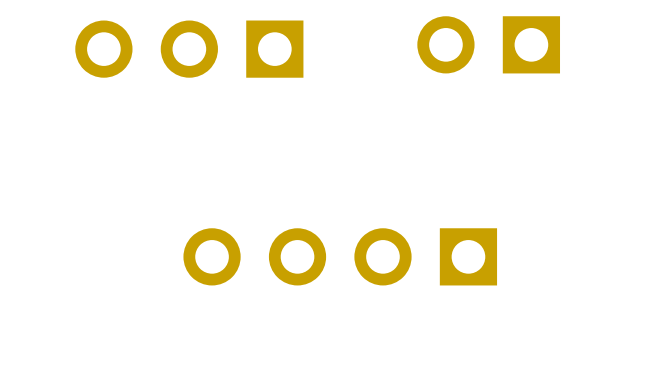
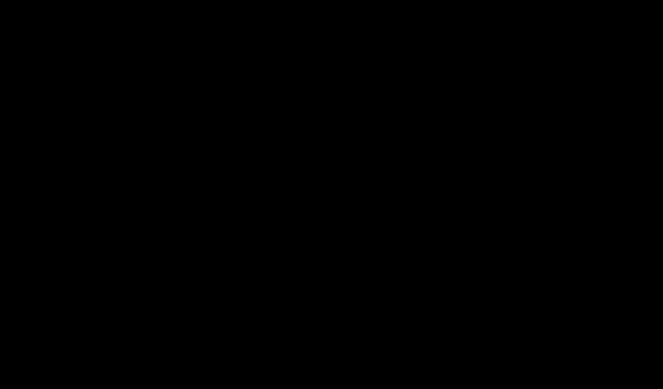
part: (488, 44) -> none
part: (189, 49) -> none
part: (340, 256) -> none

